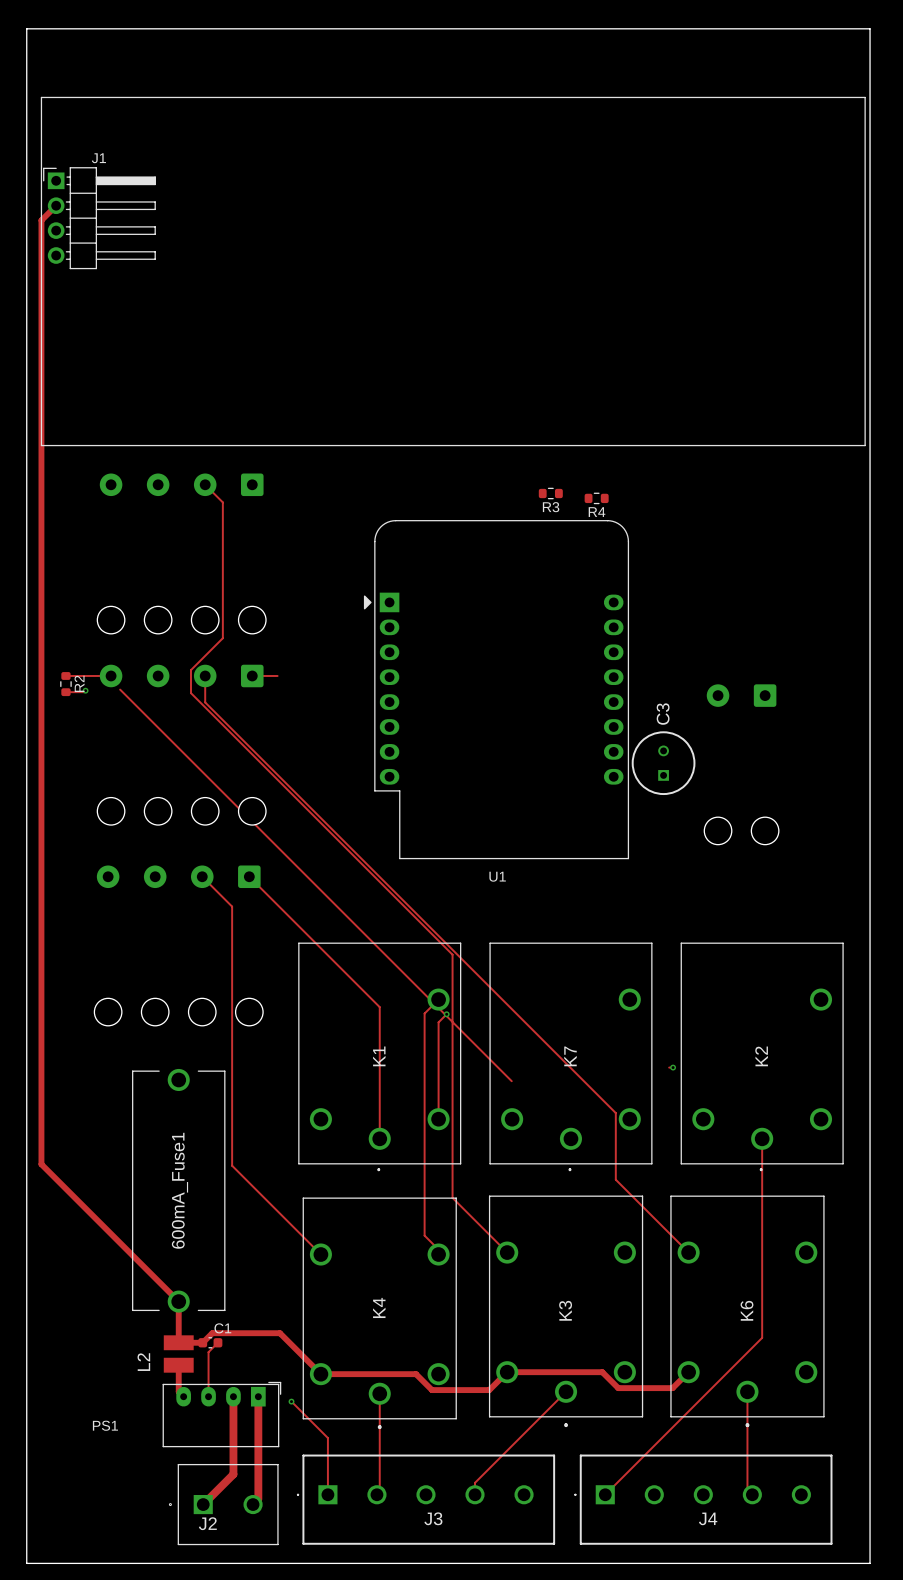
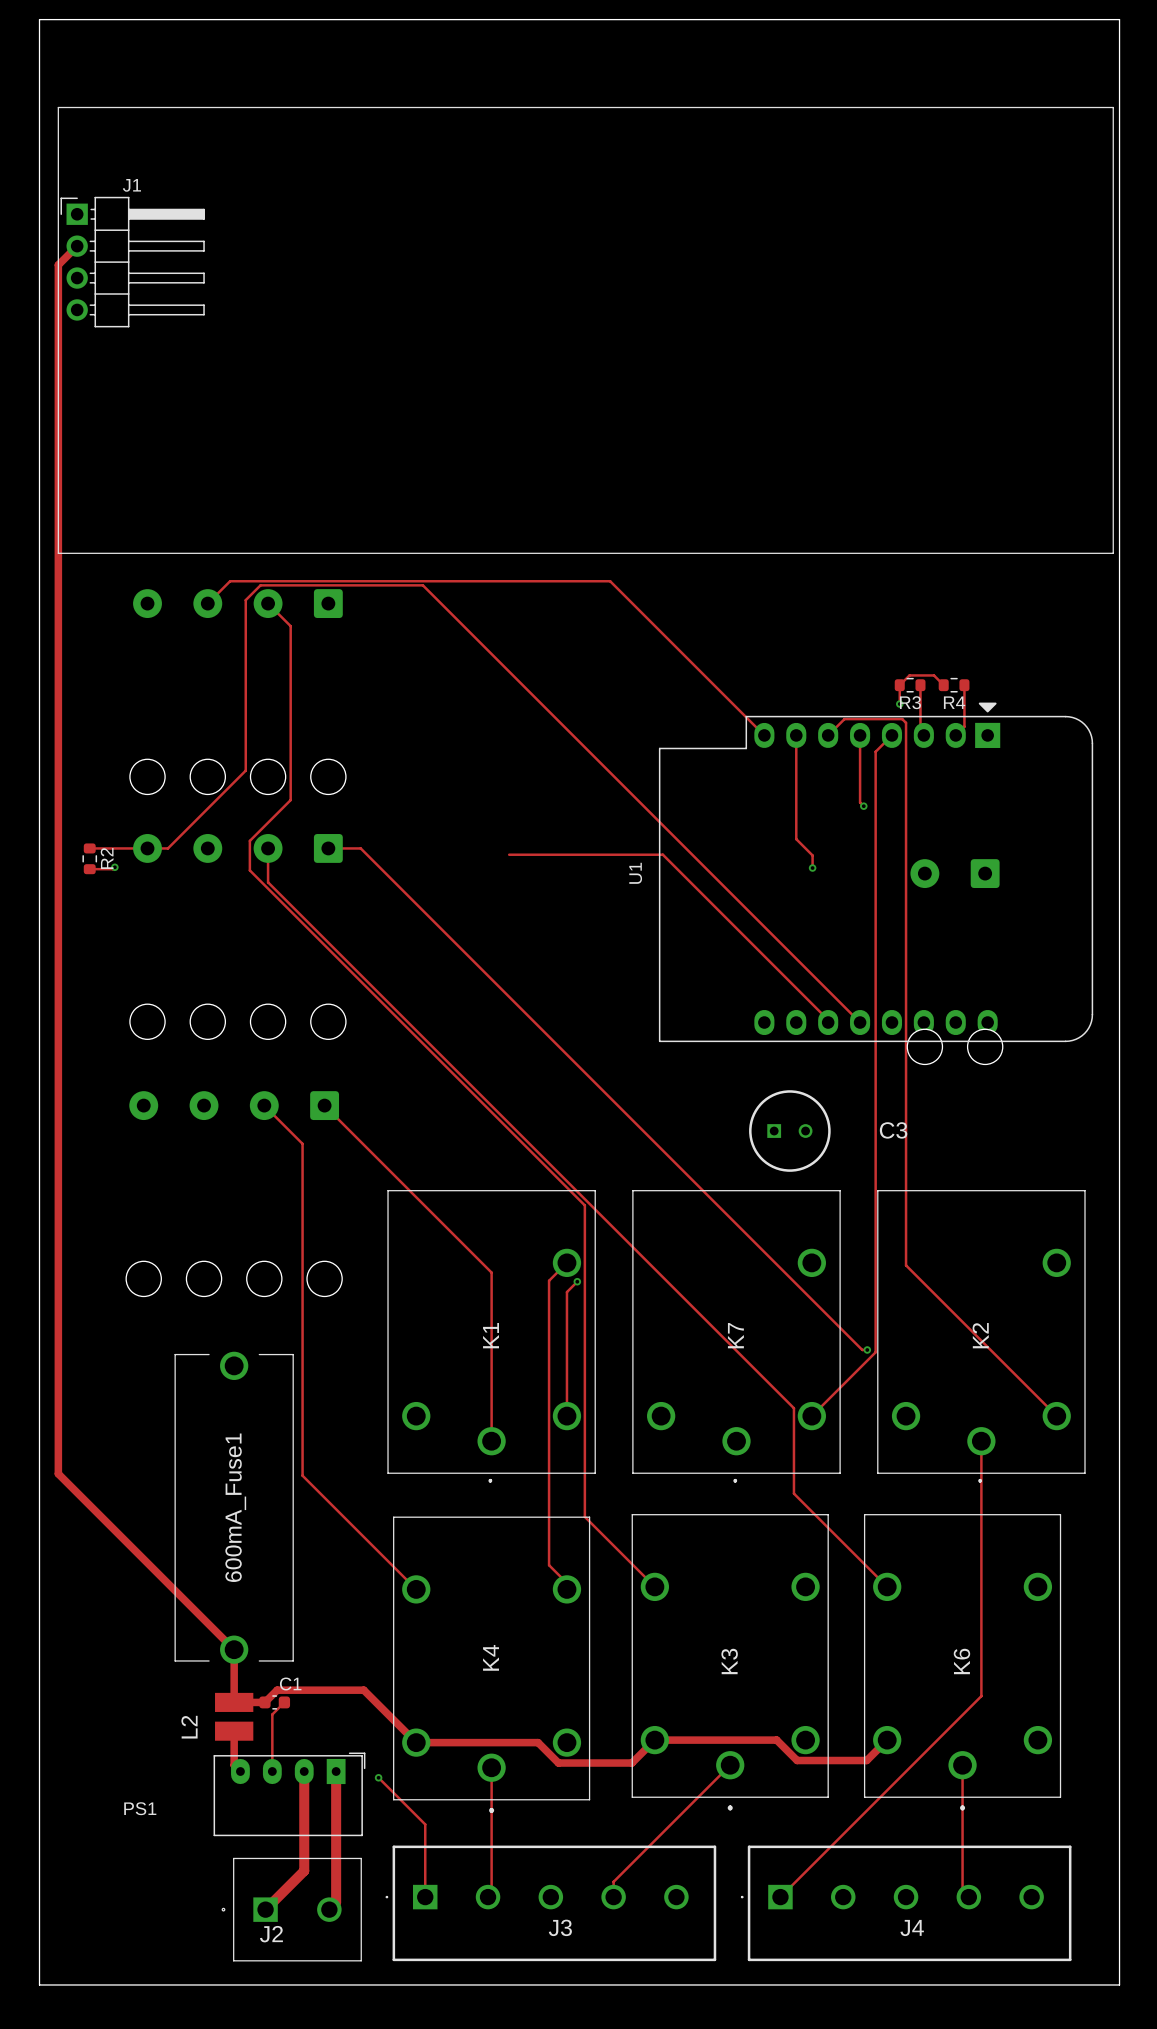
track: none -> (207, 603) (230, 581) (610, 581) (764, 735)
R3 position: (550, 493) -> (910, 685)
R4 position: (596, 498) -> (954, 685)
track: none -> (920, 685) (920, 732) (923, 735)
track: none -> (943, 685) (933, 675) (909, 675) (899, 685) (899, 704)
track: none -> (964, 685) (964, 726) (955, 735)
via: none -> (899, 704)
track: none -> (796, 735) (796, 839) (812, 855) (812, 868)
track: none -> (828, 735) (844, 719) (902, 719) (906, 722) (906, 1265) (1056, 1416)
track: none -> (860, 735) (860, 802) (863, 806)
track: none -> (891, 735) (875, 751) (875, 1352) (811, 1416)
via: none -> (863, 806)
track: none -> (147, 848) (167, 848) (245, 770) (245, 600) (260, 585) (422, 585) (860, 1022)
track: none -> (509, 854) (662, 854) (828, 1020) (828, 1022)
track: (120, 689) (511, 1081) -> (360, 848) (862, 1349)
U1 rotation: 0° (496, 689) -> 90° clockwise (876, 872)
via: none -> (812, 868)
C3 name position: C3 (663, 714) -> C3 (893, 1130)
C3 rotation: 0° (663, 763) -> 90° clockwise (789, 1131)
C3 position: (663, 763) -> (789, 1131)

